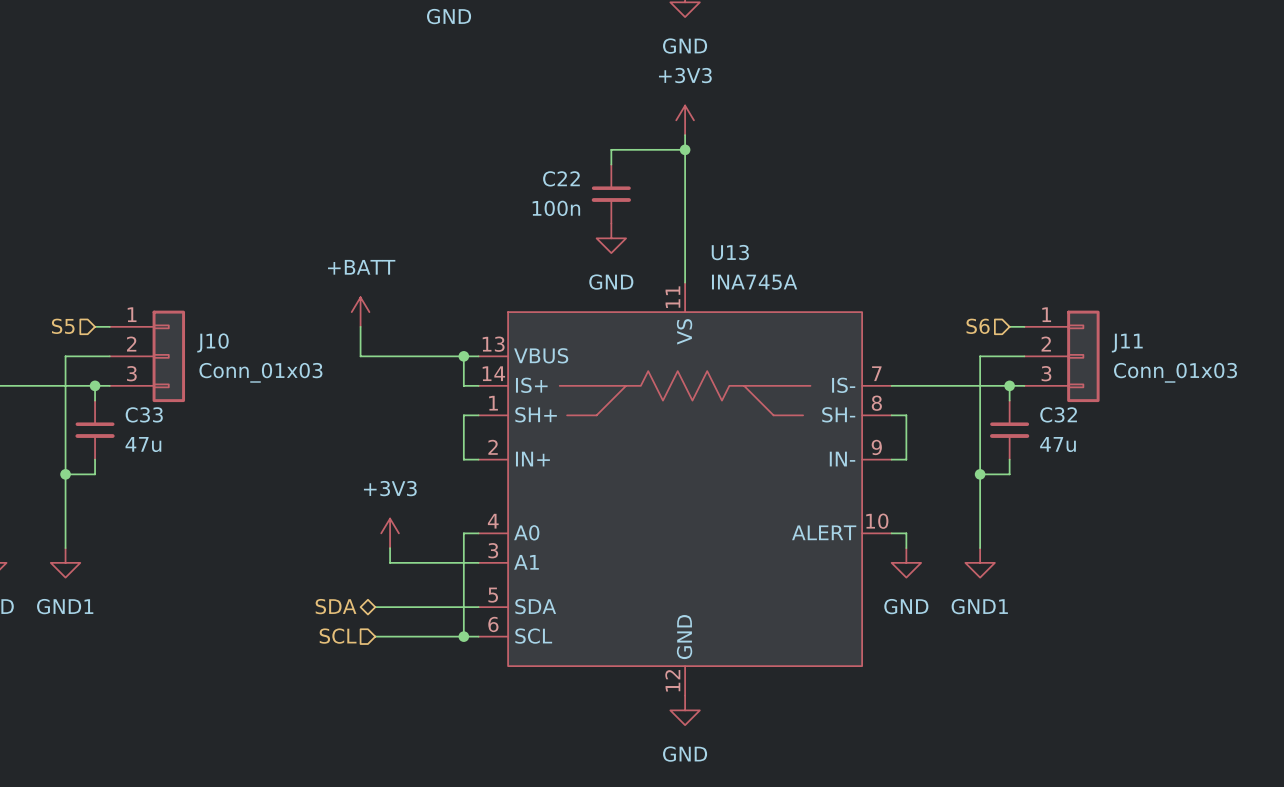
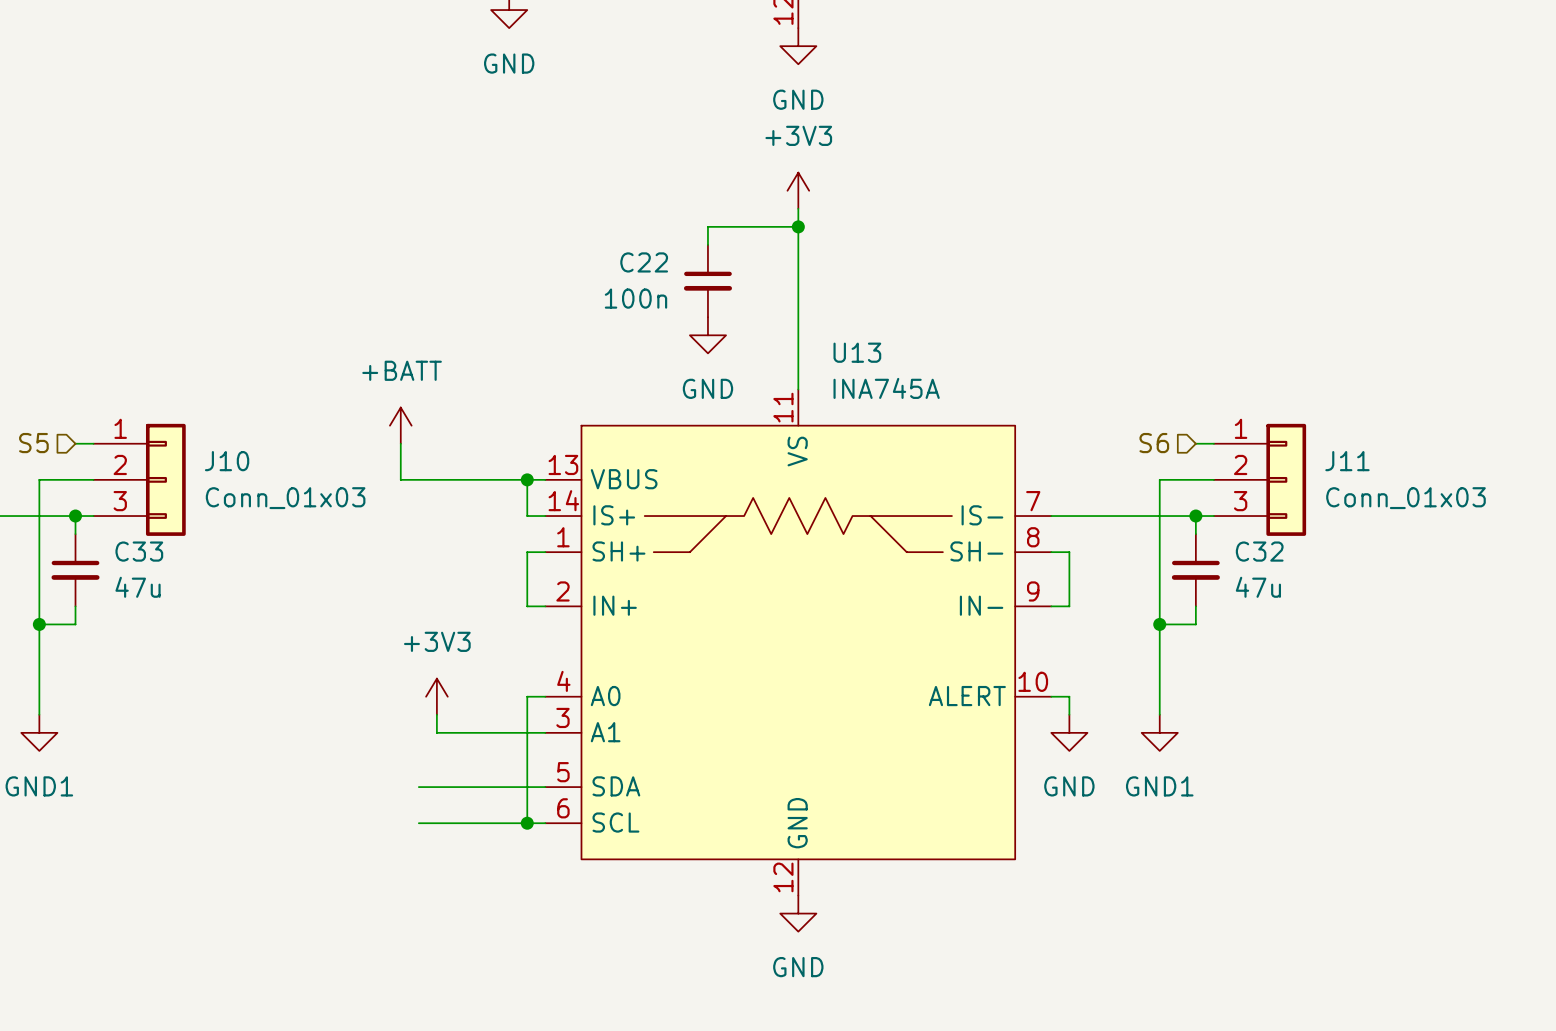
hierarchical label: SDA (336, 606) -> none
hierarchical label: SCL (338, 636) -> none

